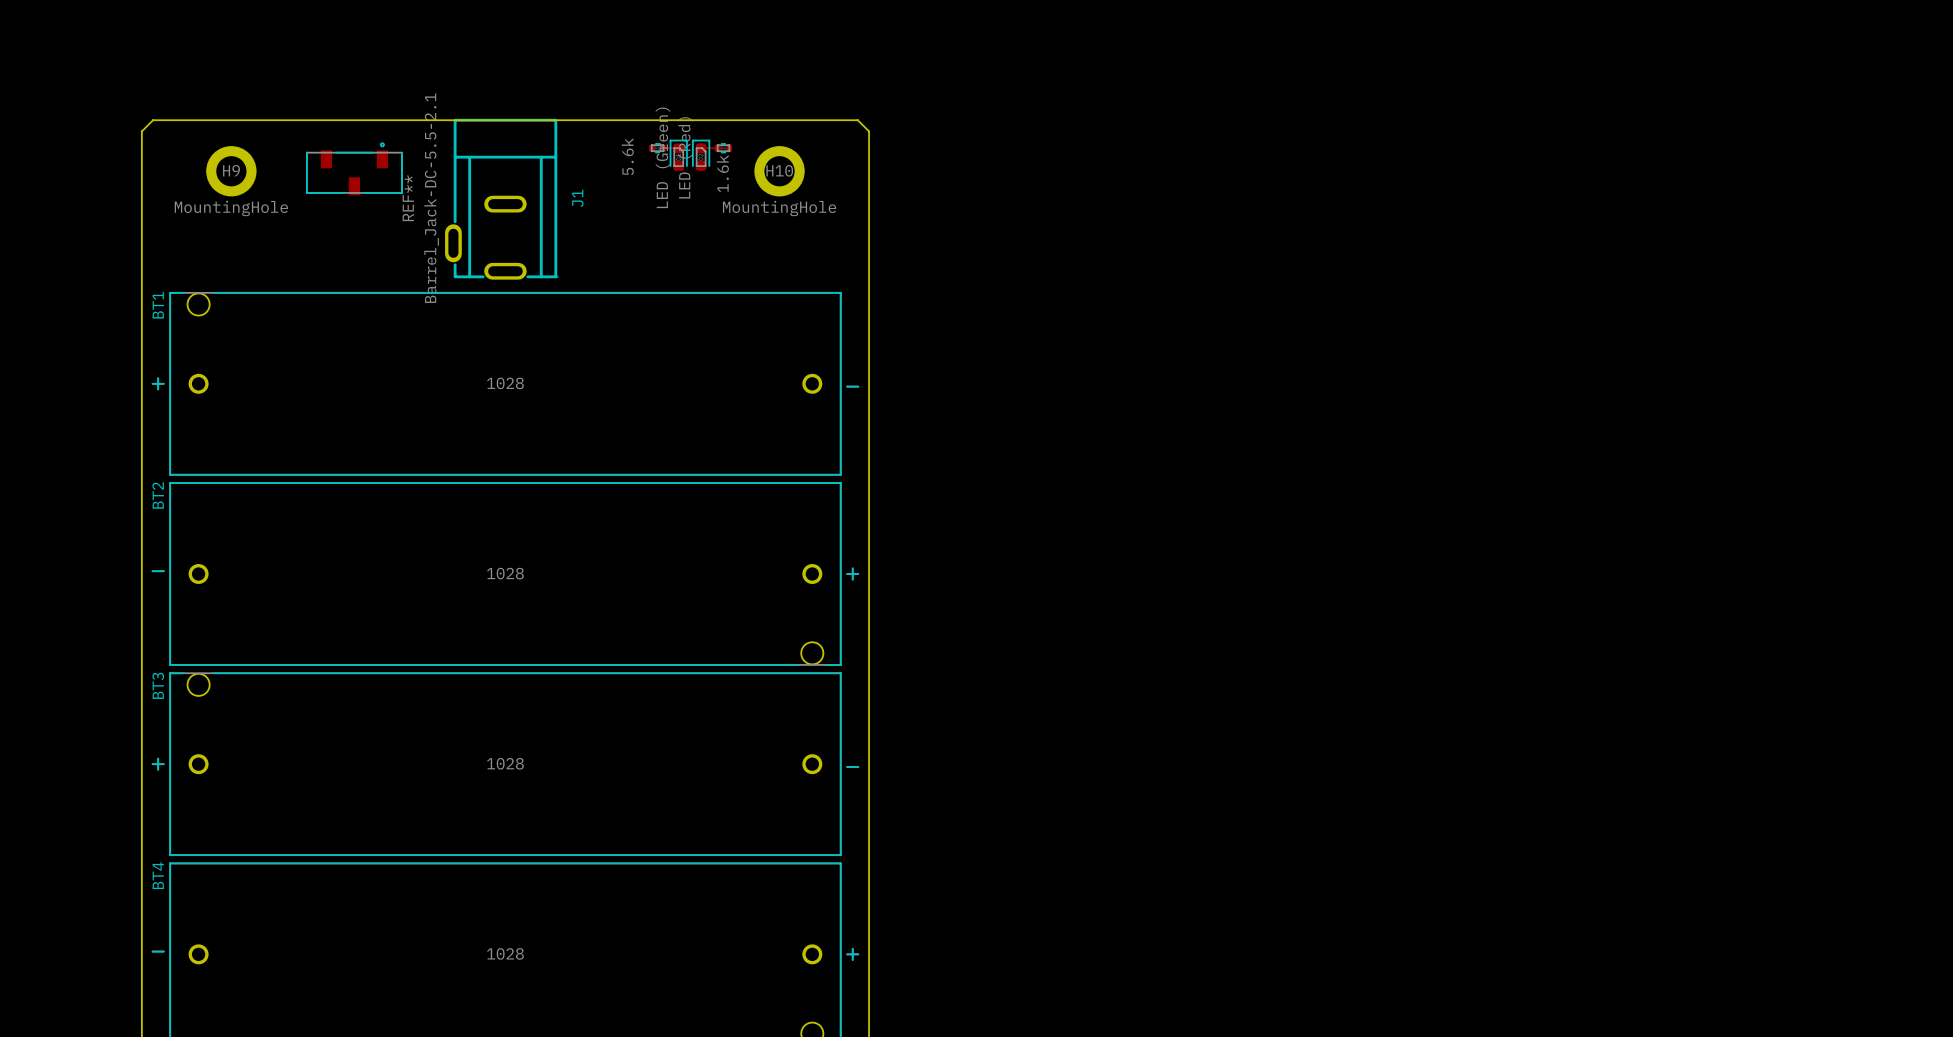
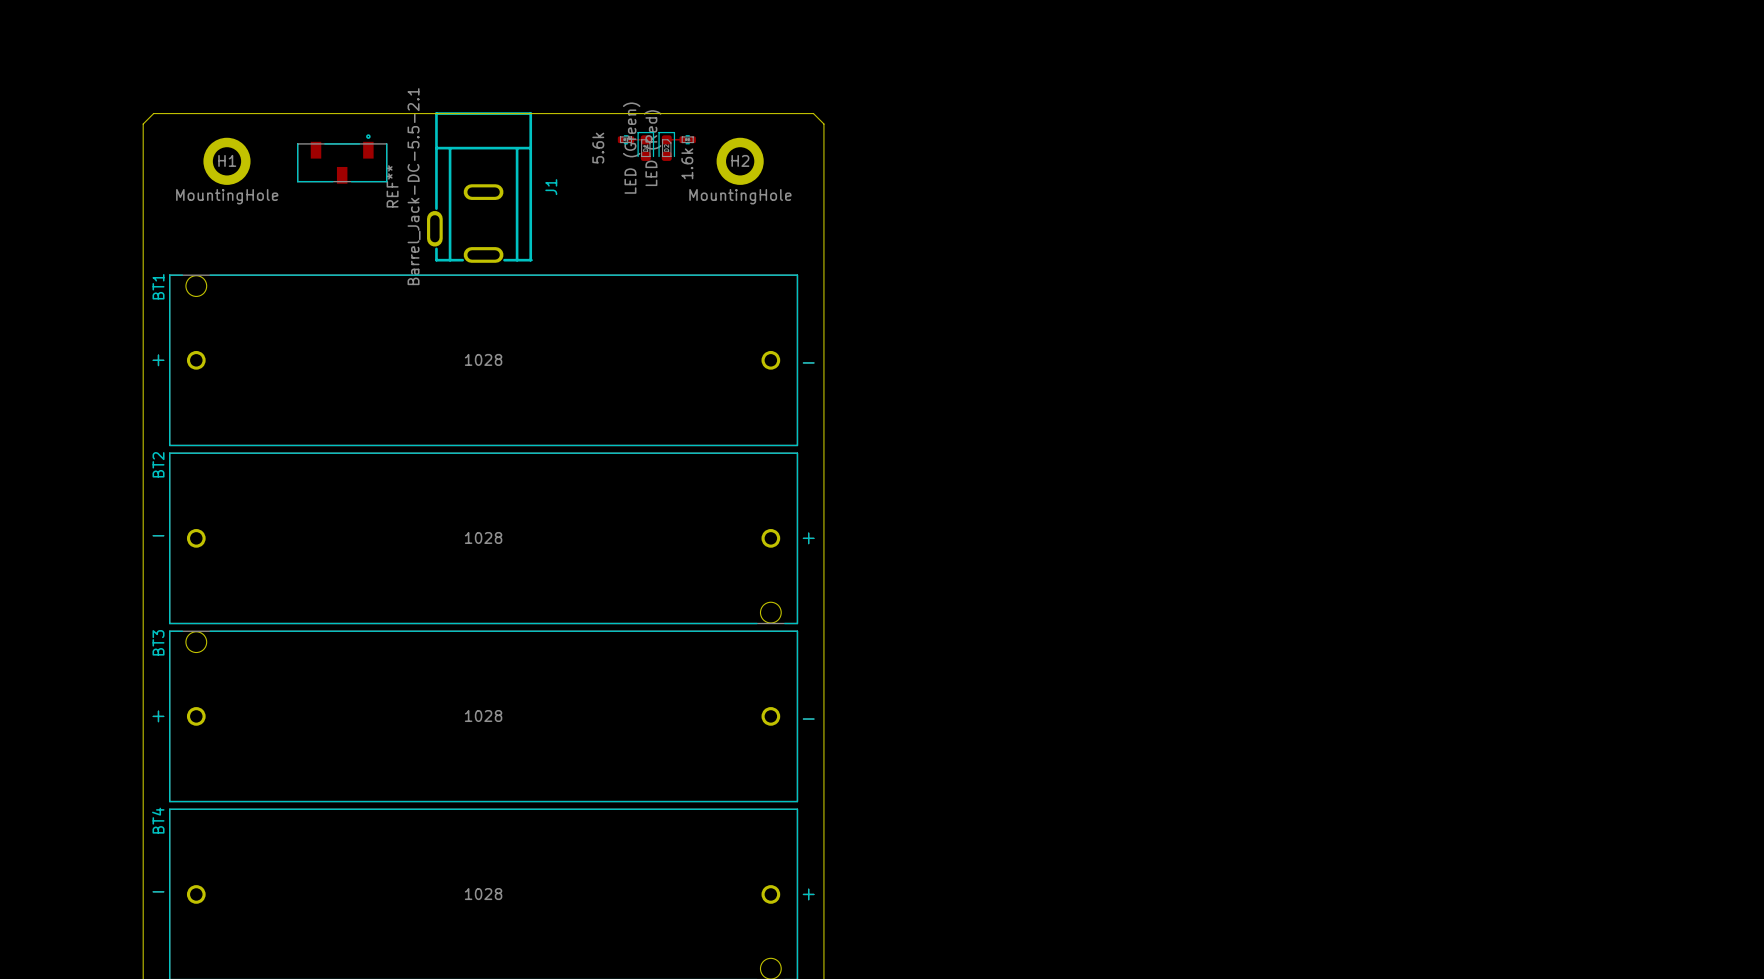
H9 name: H9 (231, 170) -> H1 (227, 160)
H10 name: H10 (779, 170) -> H2 (740, 160)

